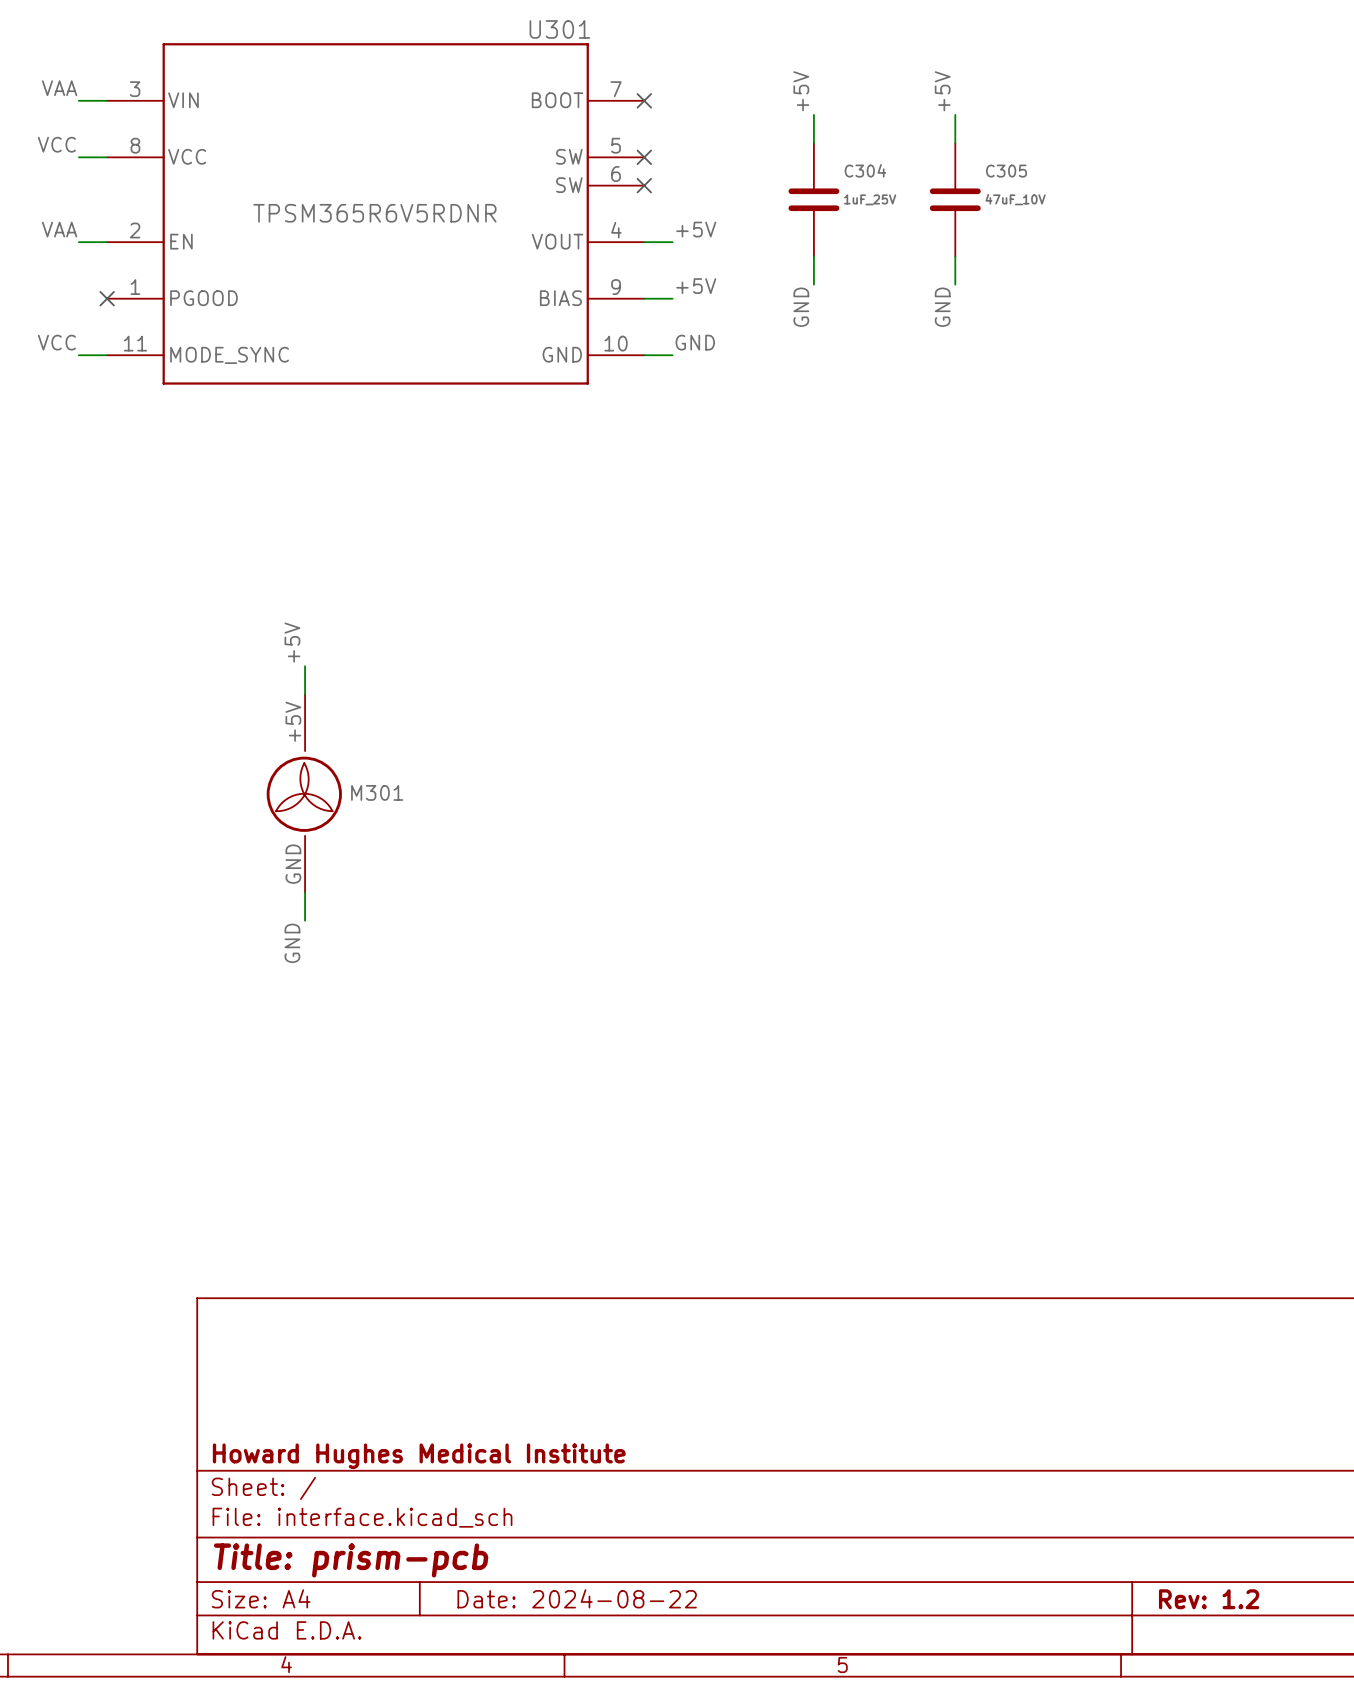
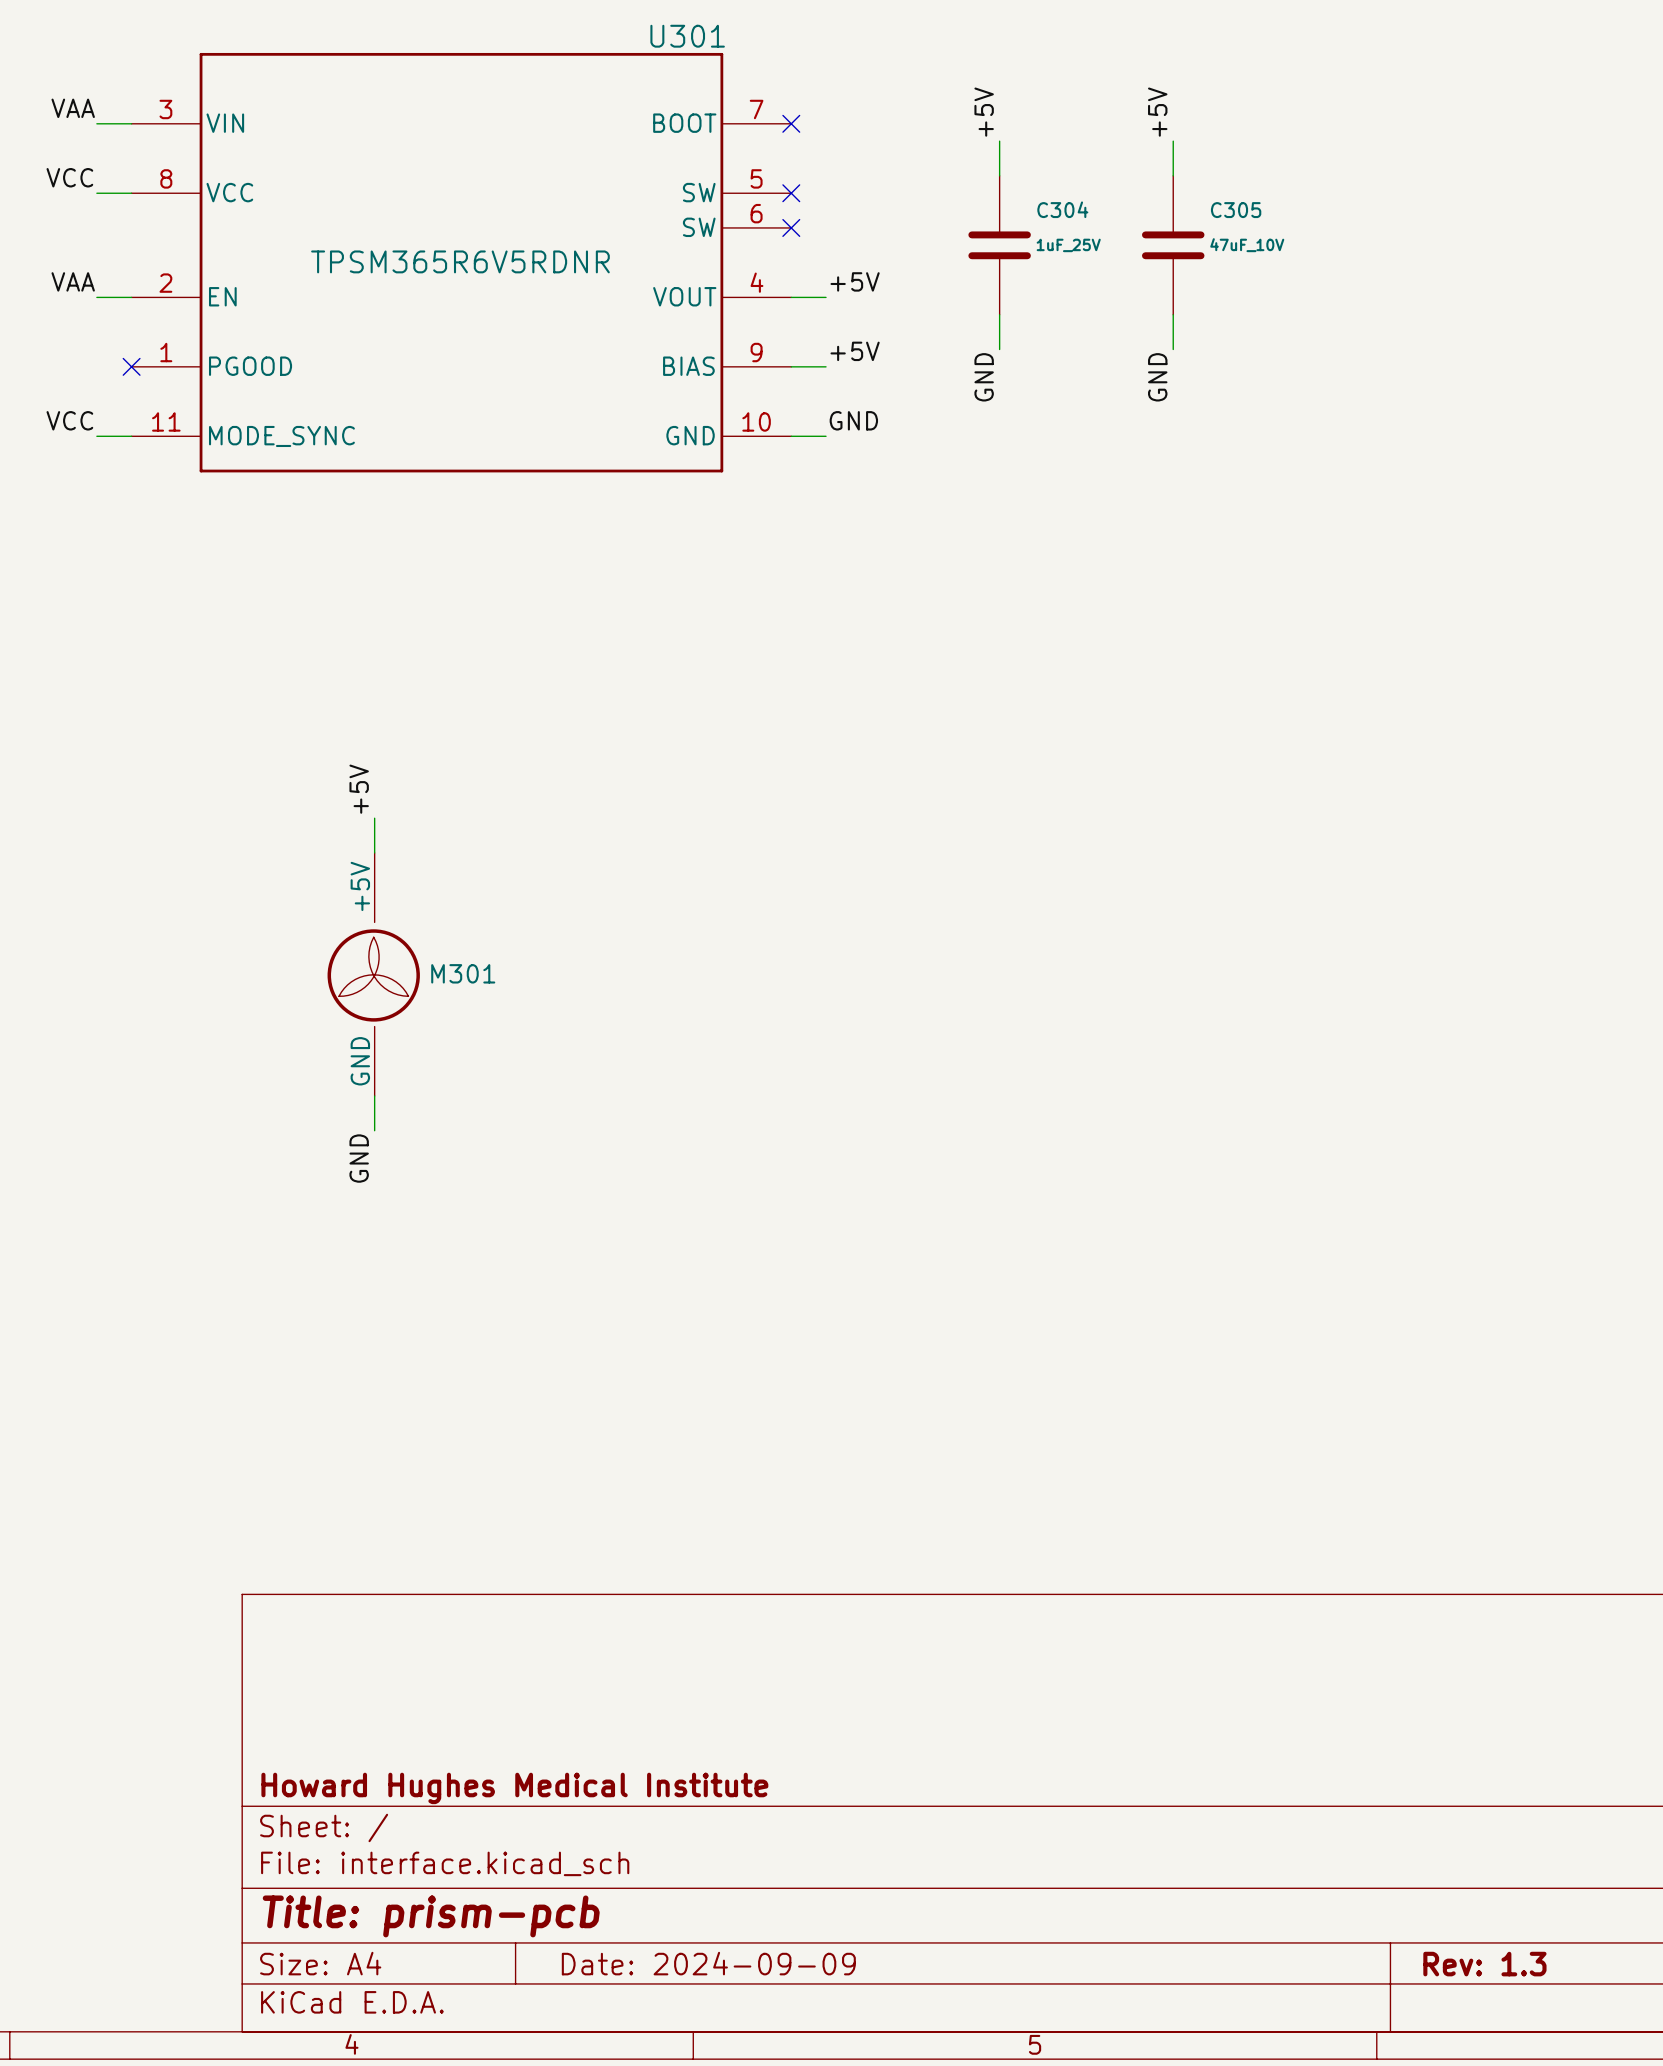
title block: Date: 2024-08-22 (577, 1598) -> Date: 2024-09-09 (708, 1963)
title block: Rev: 1.2 (1209, 1599) -> Rev: 1.3 (1484, 1964)

